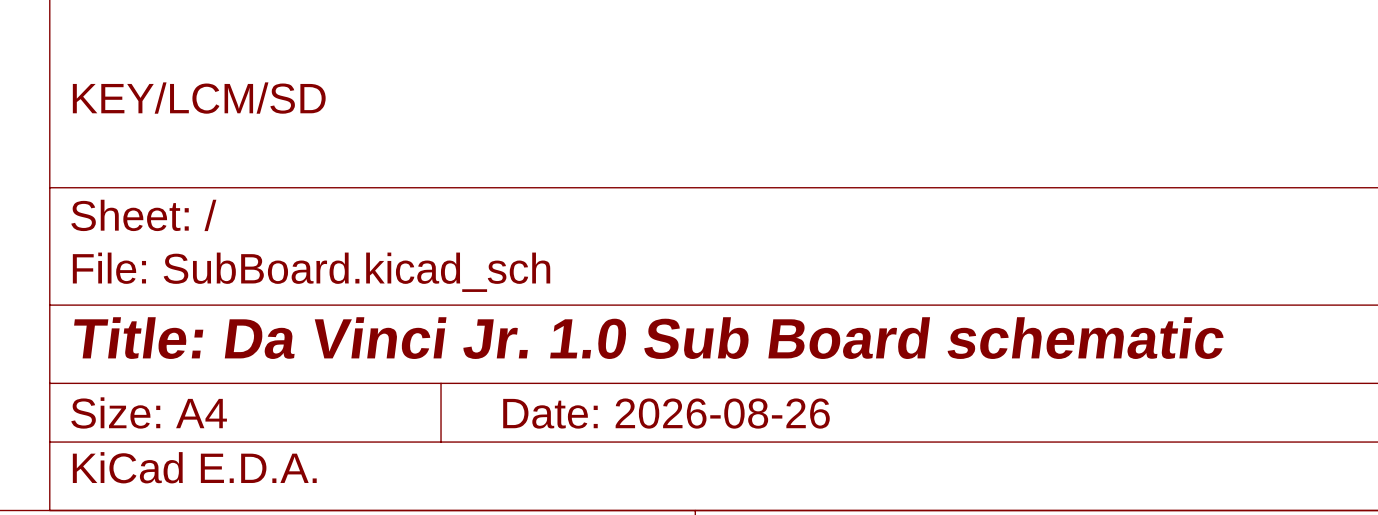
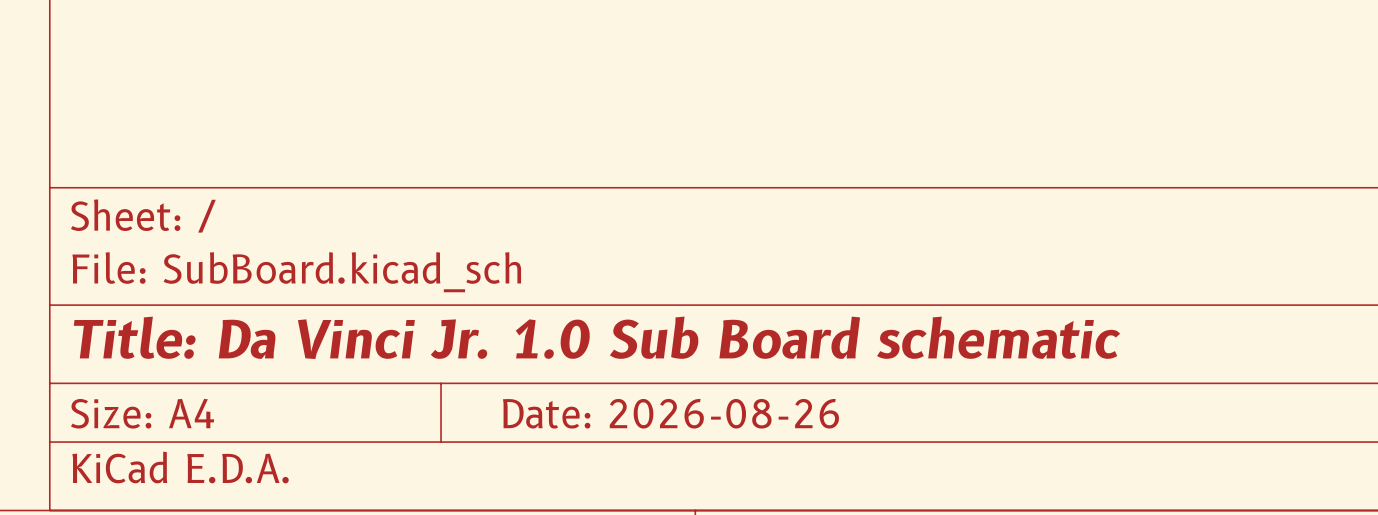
title block: KEY/LCM/SD (199, 98) -> none

